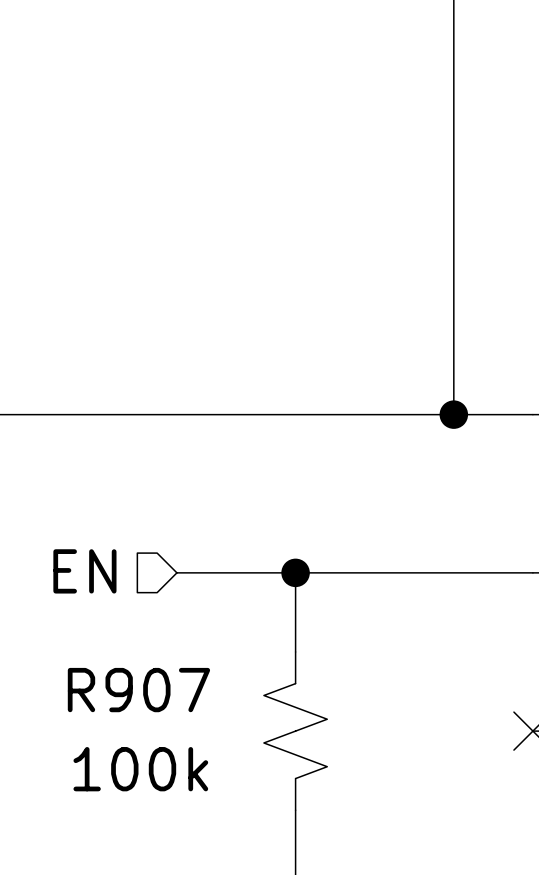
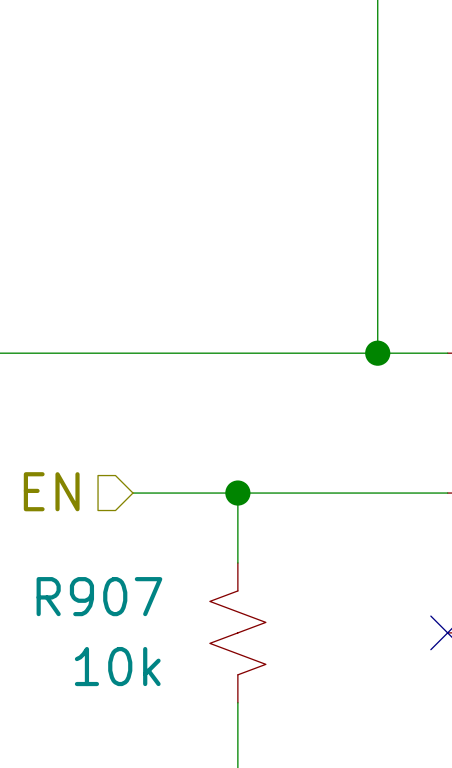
R907 value: 100k (140, 769) -> 10k (117, 666)

